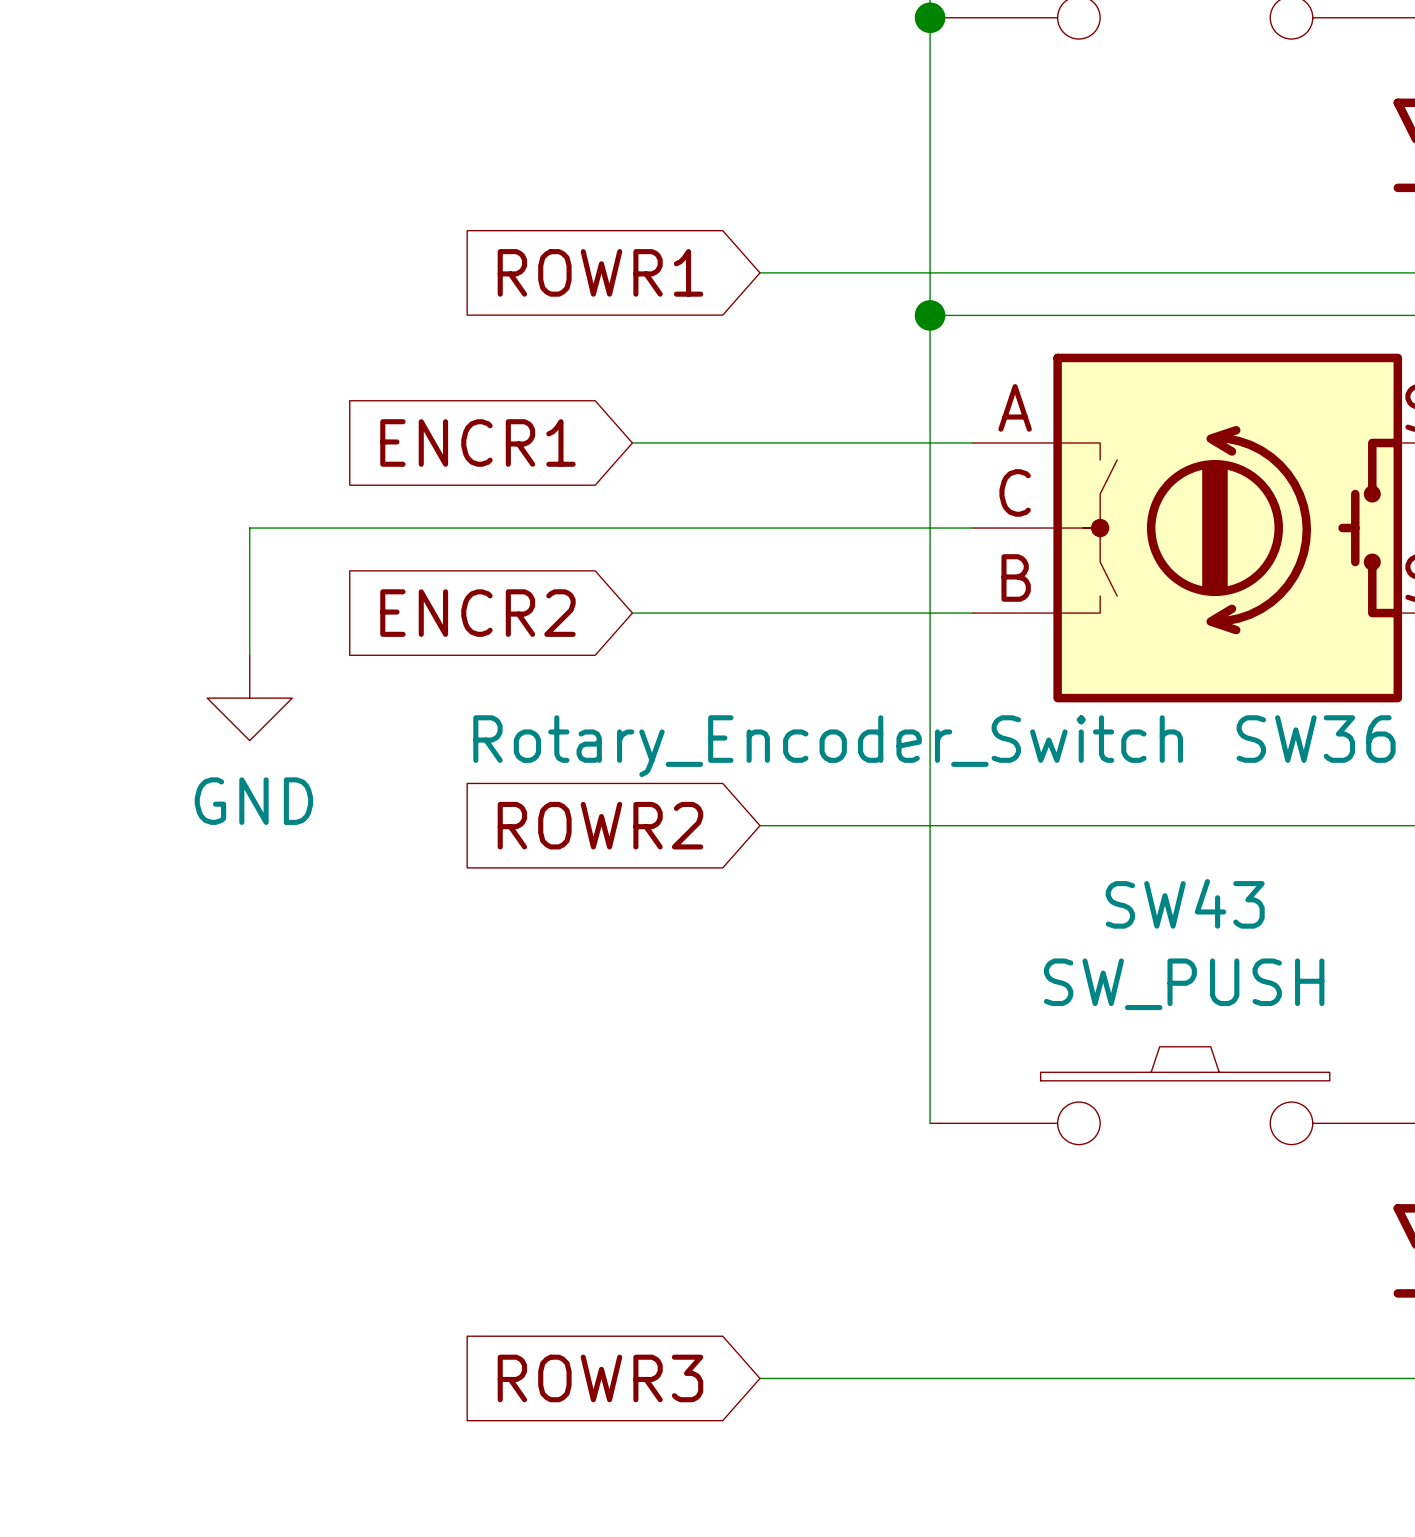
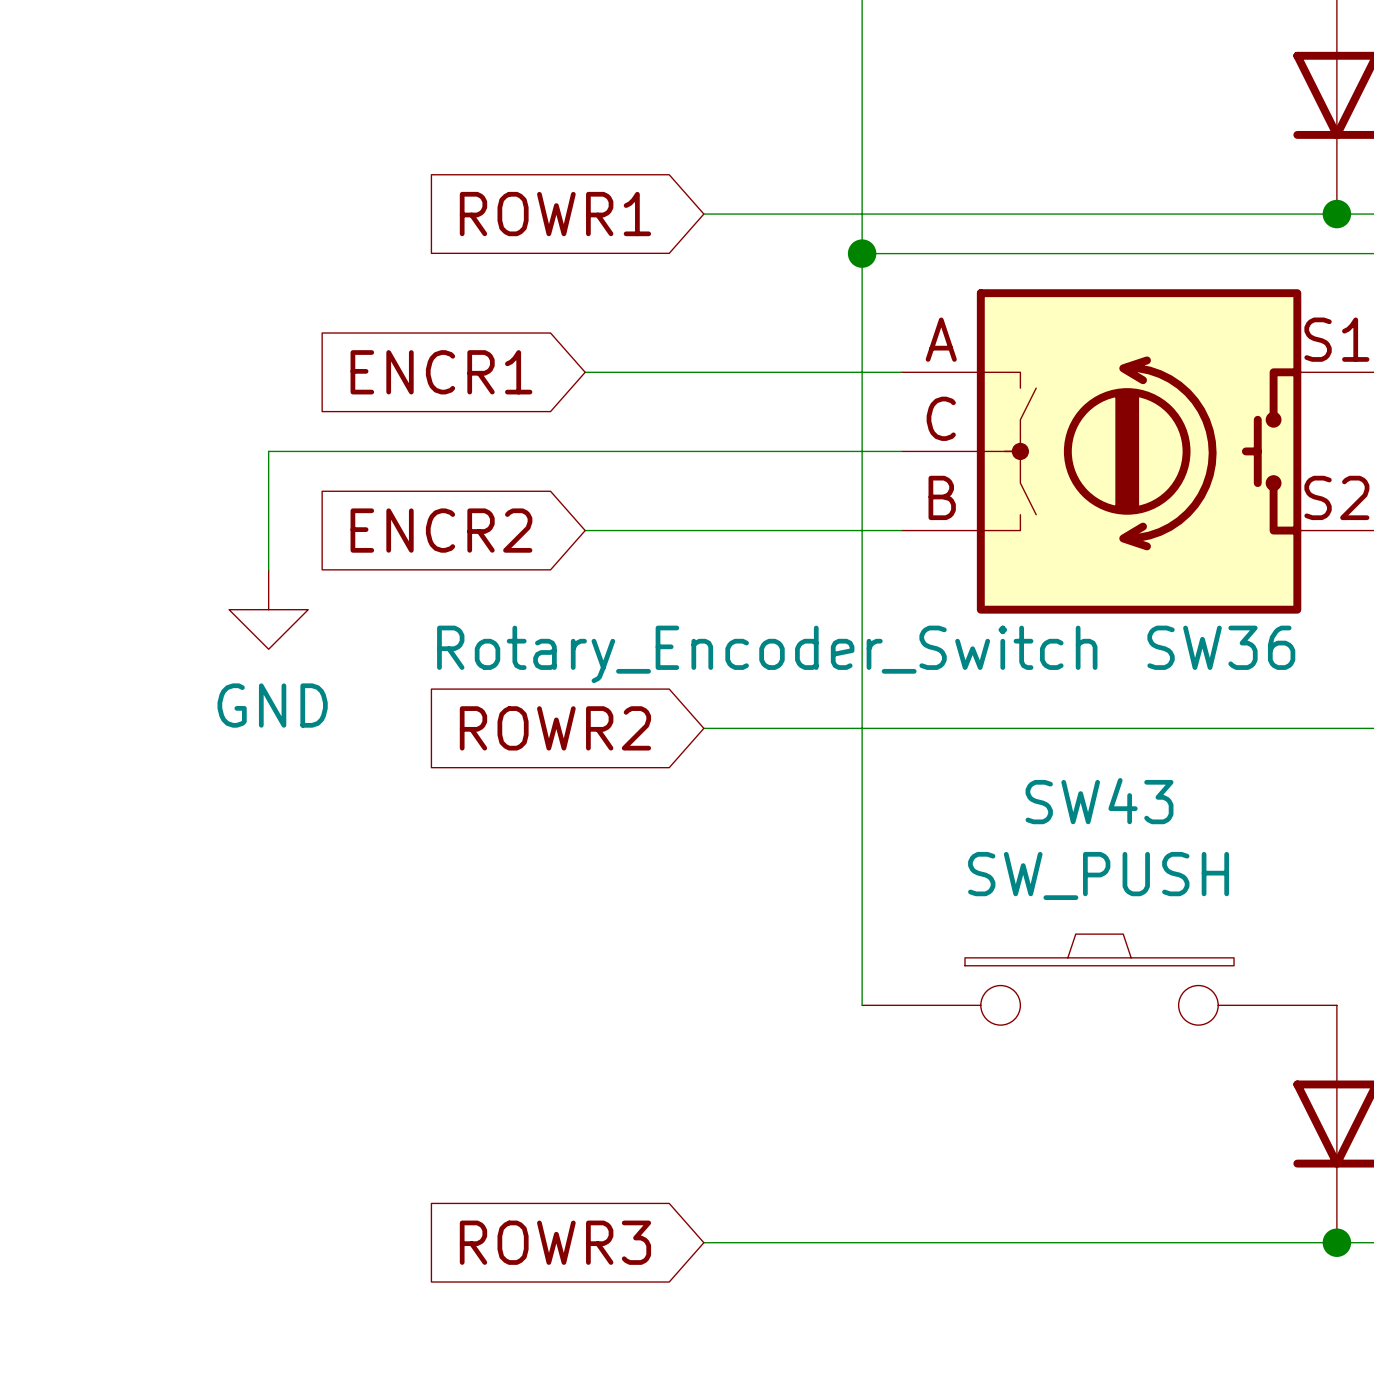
wire: (292, 528) (249, 528) (249, 655) -> (268, 451) (268, 570)
power symbol position: GND (249, 698) -> GND (268, 609)

